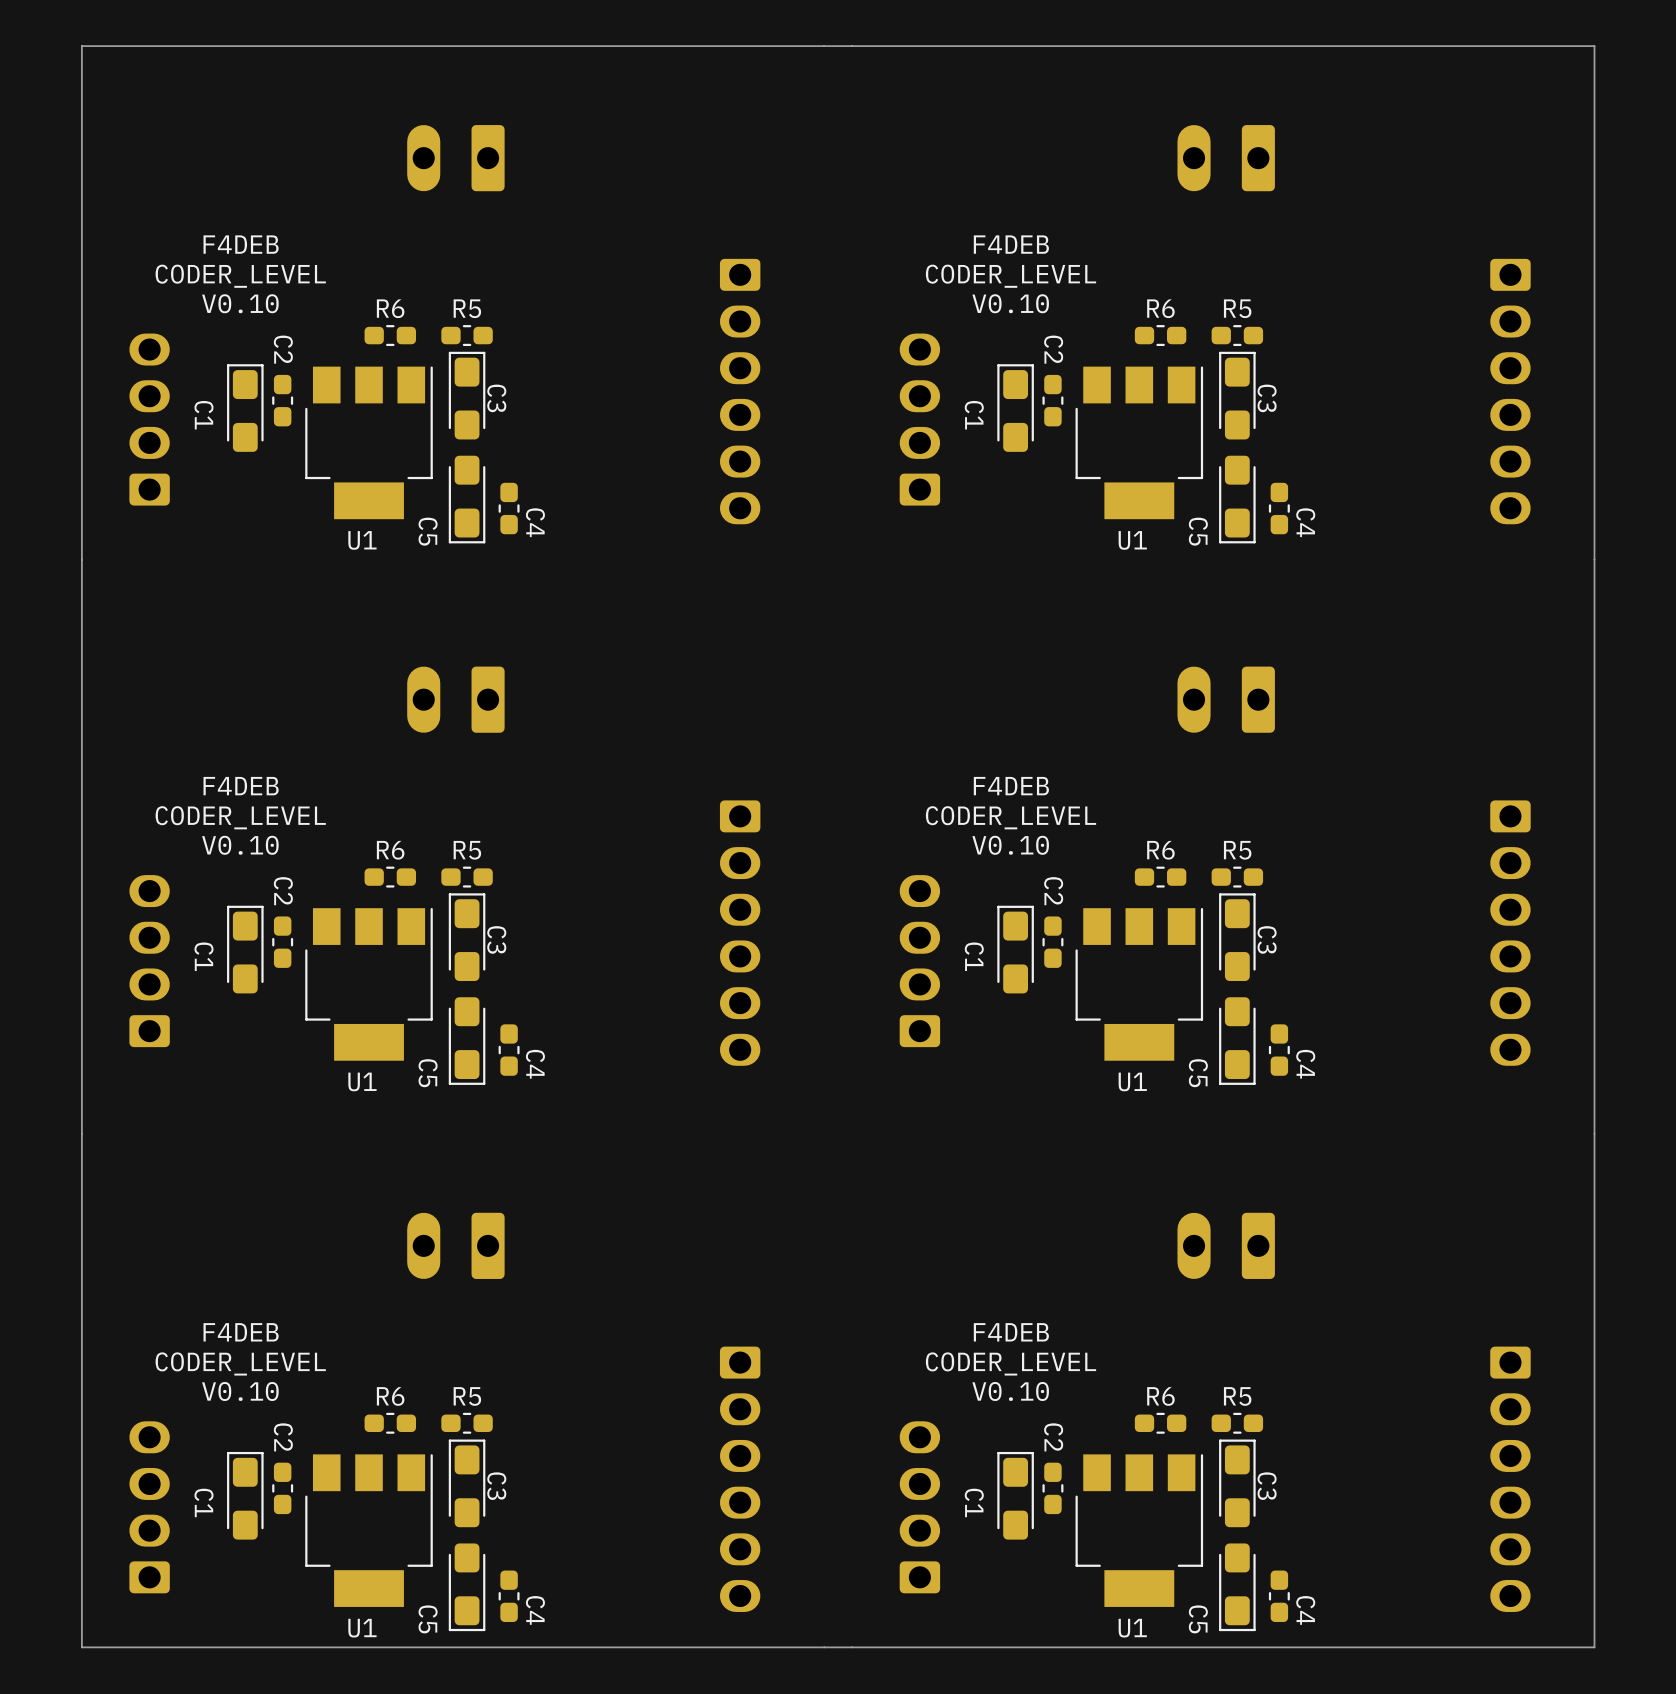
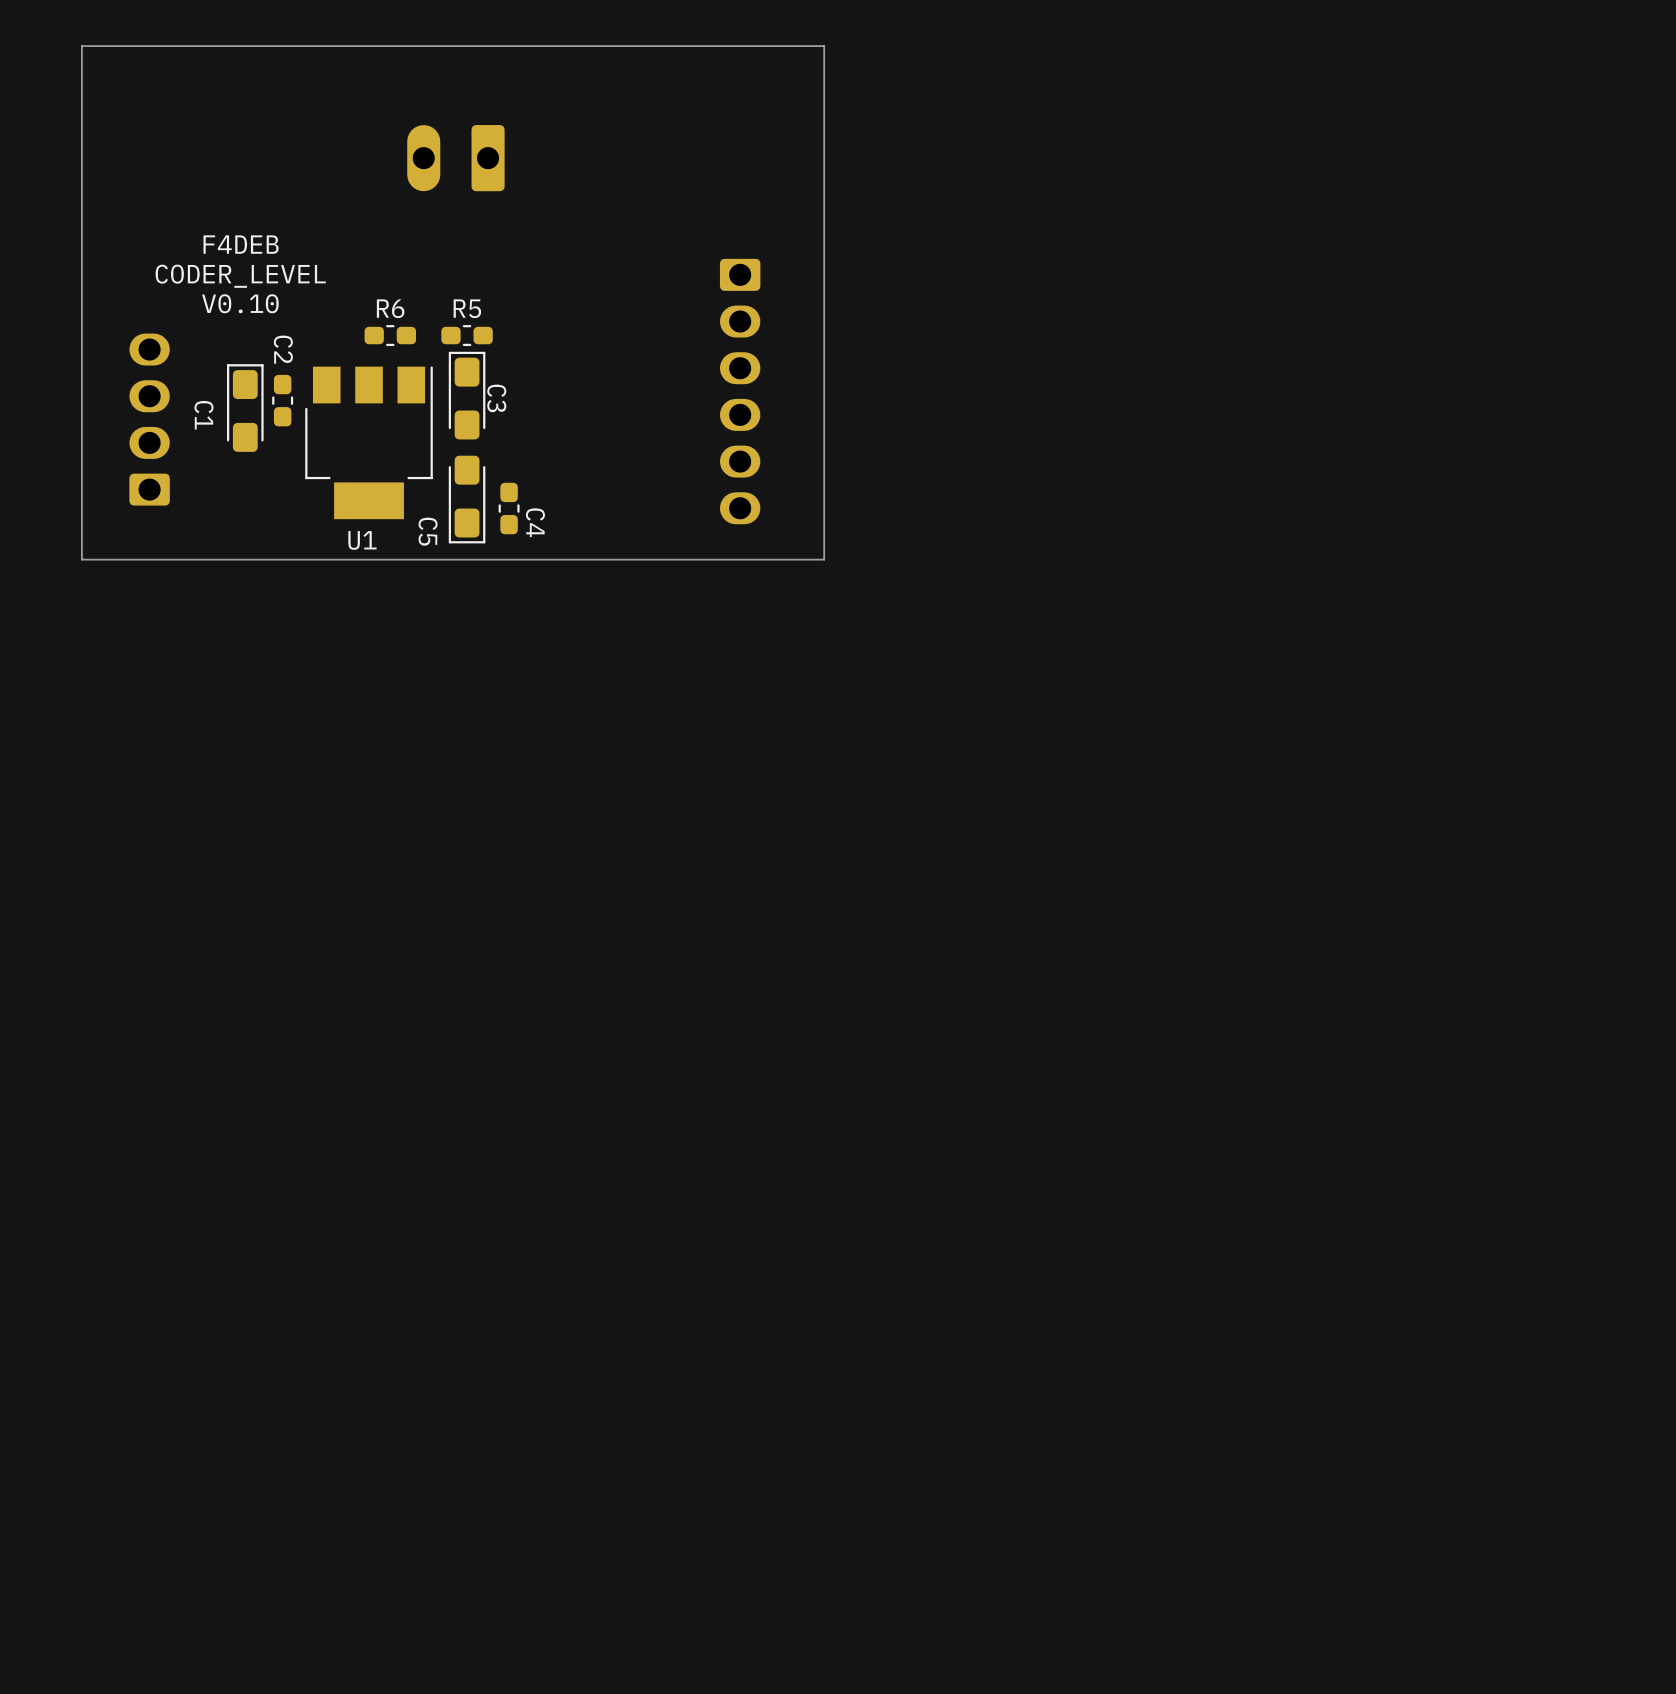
board edge: (824, 46) (1594, 46) (1594, 1647) (81, 1647) (81, 559) -> (824, 46) (824, 559) (81, 559)
part: (1226, 158) -> none
text: F4DEB (1011, 244) -> none
text: CODER_LEVEL (1011, 276) -> none
text: V0.10 (1010, 303) -> none
R6: (1160, 335) -> none
R5: (1237, 335) -> none
part: (1510, 391) -> none
C3: (1237, 395) -> none
C2: (1052, 400) -> none
C1: (1015, 408) -> none
part: (919, 419) -> none
U1: (1139, 442) -> none
C5: (1237, 499) -> none
C4: (1279, 508) -> none
part: (455, 699) -> none
part: (1226, 699) -> none
text: F4DEB (241, 786) -> none
text: F4DEB (1011, 786) -> none
text: CODER_LEVEL (240, 817) -> none
text: CODER_LEVEL (1011, 817) -> none
text: V0.10 (240, 845) -> none
text: V0.10 (1010, 845) -> none
R6: (390, 877) -> none
R5: (467, 877) -> none
R6: (1160, 877) -> none
R5: (1237, 877) -> none
part: (740, 933) -> none
part: (1510, 933) -> none
C3: (467, 937) -> none
C3: (1237, 937) -> none
C2: (282, 942) -> none
C2: (1052, 942) -> none
C1: (245, 949) -> none
C1: (1015, 949) -> none
part: (149, 961) -> none
part: (919, 961) -> none
U1: (369, 984) -> none
U1: (1139, 984) -> none
C5: (467, 1041) -> none
C5: (1237, 1041) -> none
C4: (509, 1050) -> none
C4: (1279, 1050) -> none
part: (455, 1245) -> none
part: (1226, 1245) -> none
text: F4DEB (241, 1332) -> none
text: F4DEB (1011, 1332) -> none
text: CODER_LEVEL (240, 1363) -> none
text: CODER_LEVEL (1011, 1363) -> none
text: V0.10 (240, 1391) -> none
text: V0.10 (1010, 1391) -> none
R6: (390, 1423) -> none
R5: (467, 1423) -> none
R6: (1160, 1423) -> none
R5: (1237, 1423) -> none
part: (740, 1479) -> none
part: (1510, 1479) -> none
C3: (467, 1483) -> none
C3: (1237, 1483) -> none
C2: (282, 1488) -> none
C2: (1052, 1488) -> none
C1: (245, 1495) -> none
C1: (1015, 1495) -> none
part: (149, 1507) -> none
part: (919, 1507) -> none
U1: (369, 1530) -> none
U1: (1139, 1530) -> none
C5: (467, 1587) -> none
C5: (1237, 1587) -> none
C4: (509, 1596) -> none
C4: (1279, 1596) -> none

